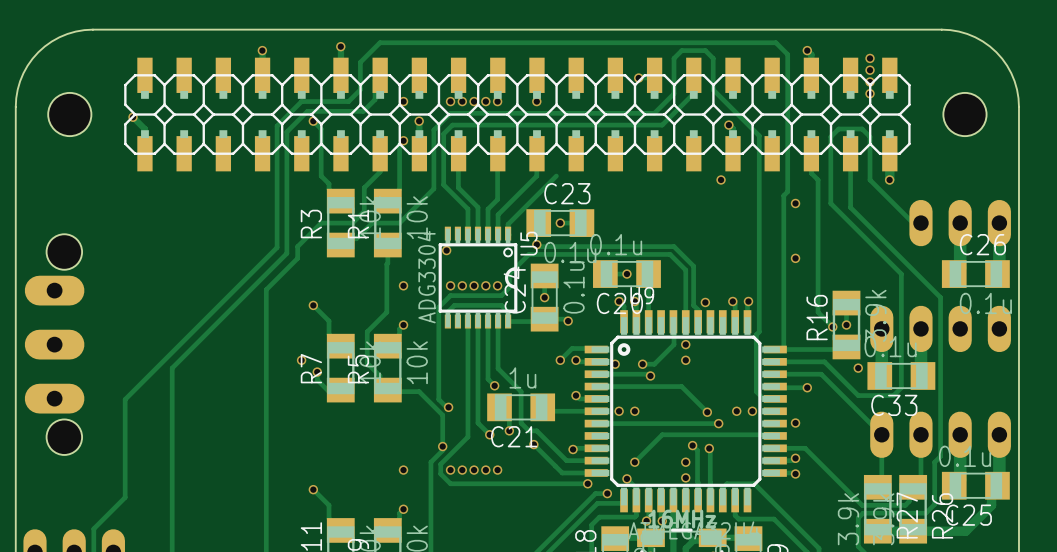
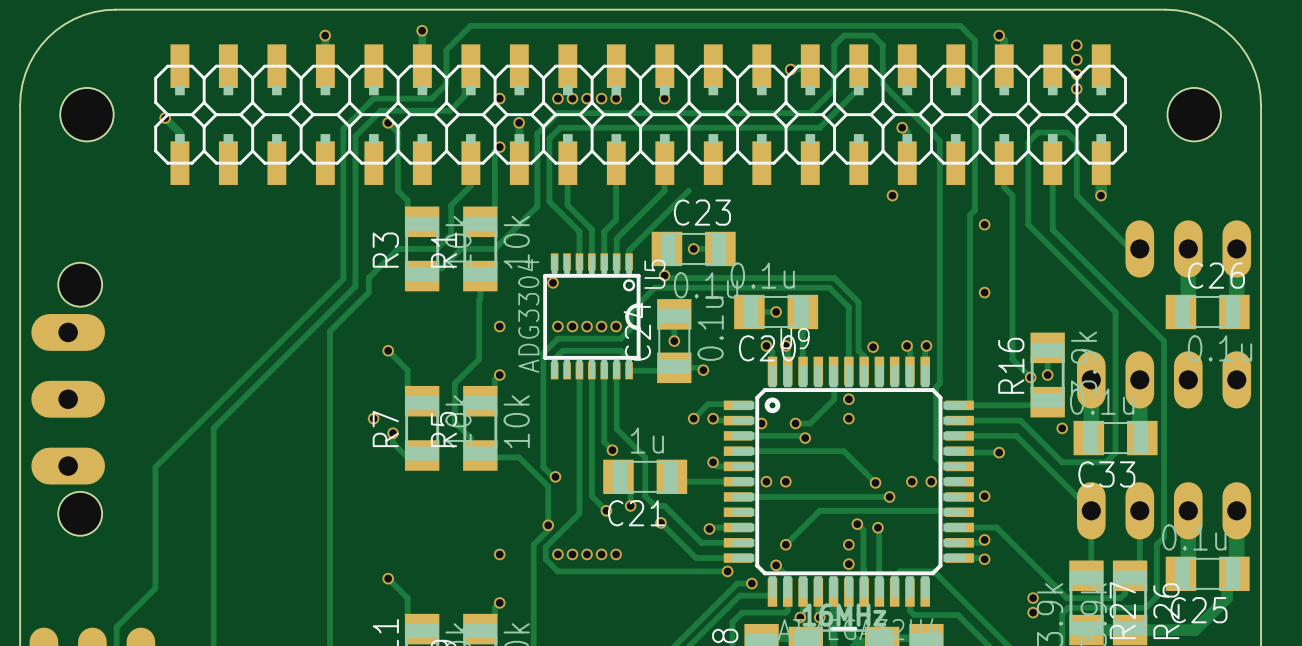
via: none -> (1033, 598)
via: none -> (1033, 612)

